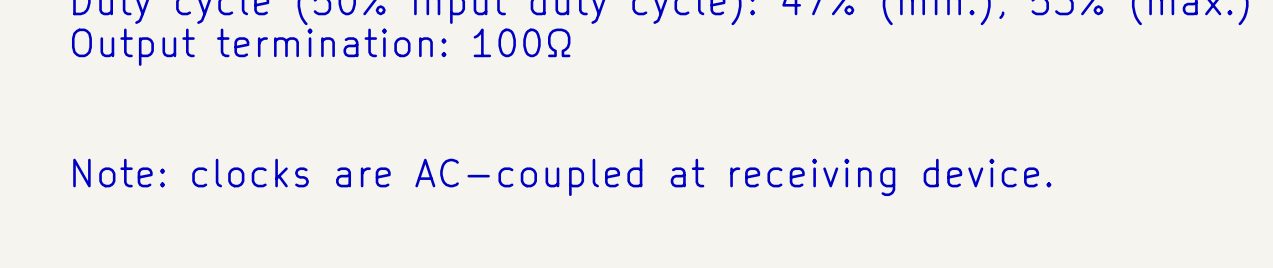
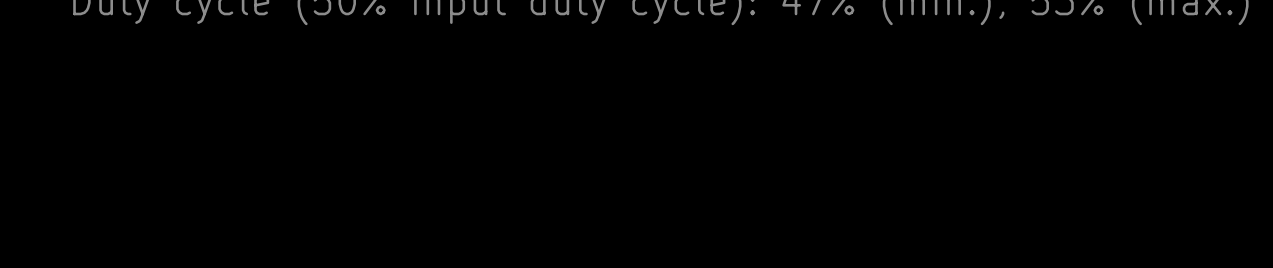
text: Output termination: 100Ω (321, 47) -> none
text: Note: clocks are AC-coupled at receiving device. (562, 177) -> none

